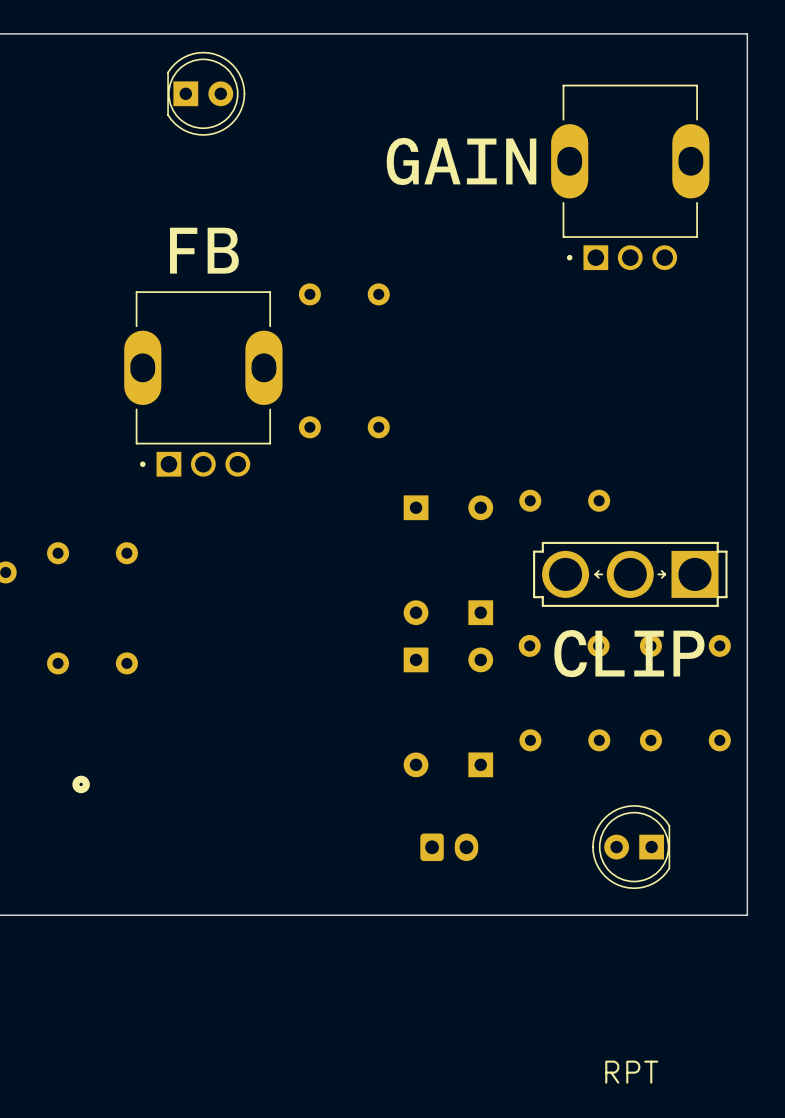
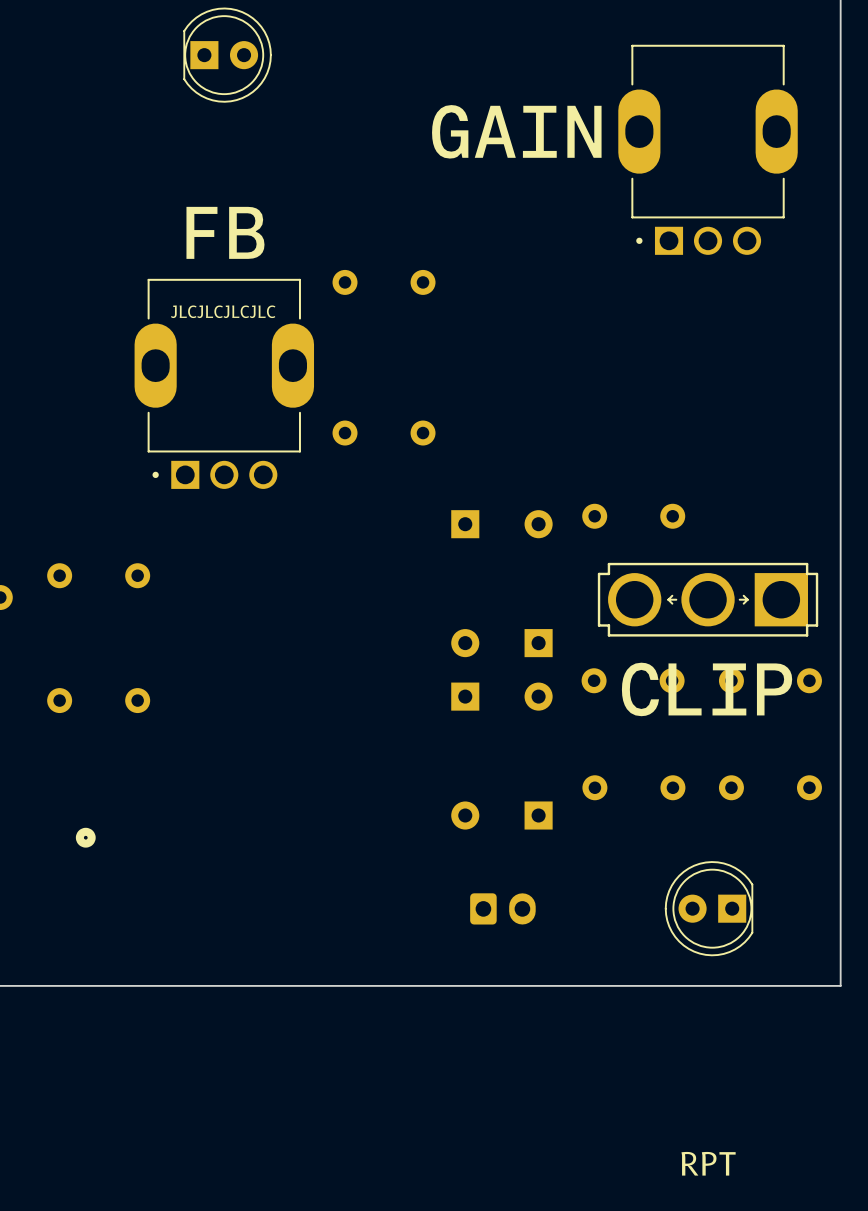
text: none -> JLCJLCJLCJLC (223, 311)

